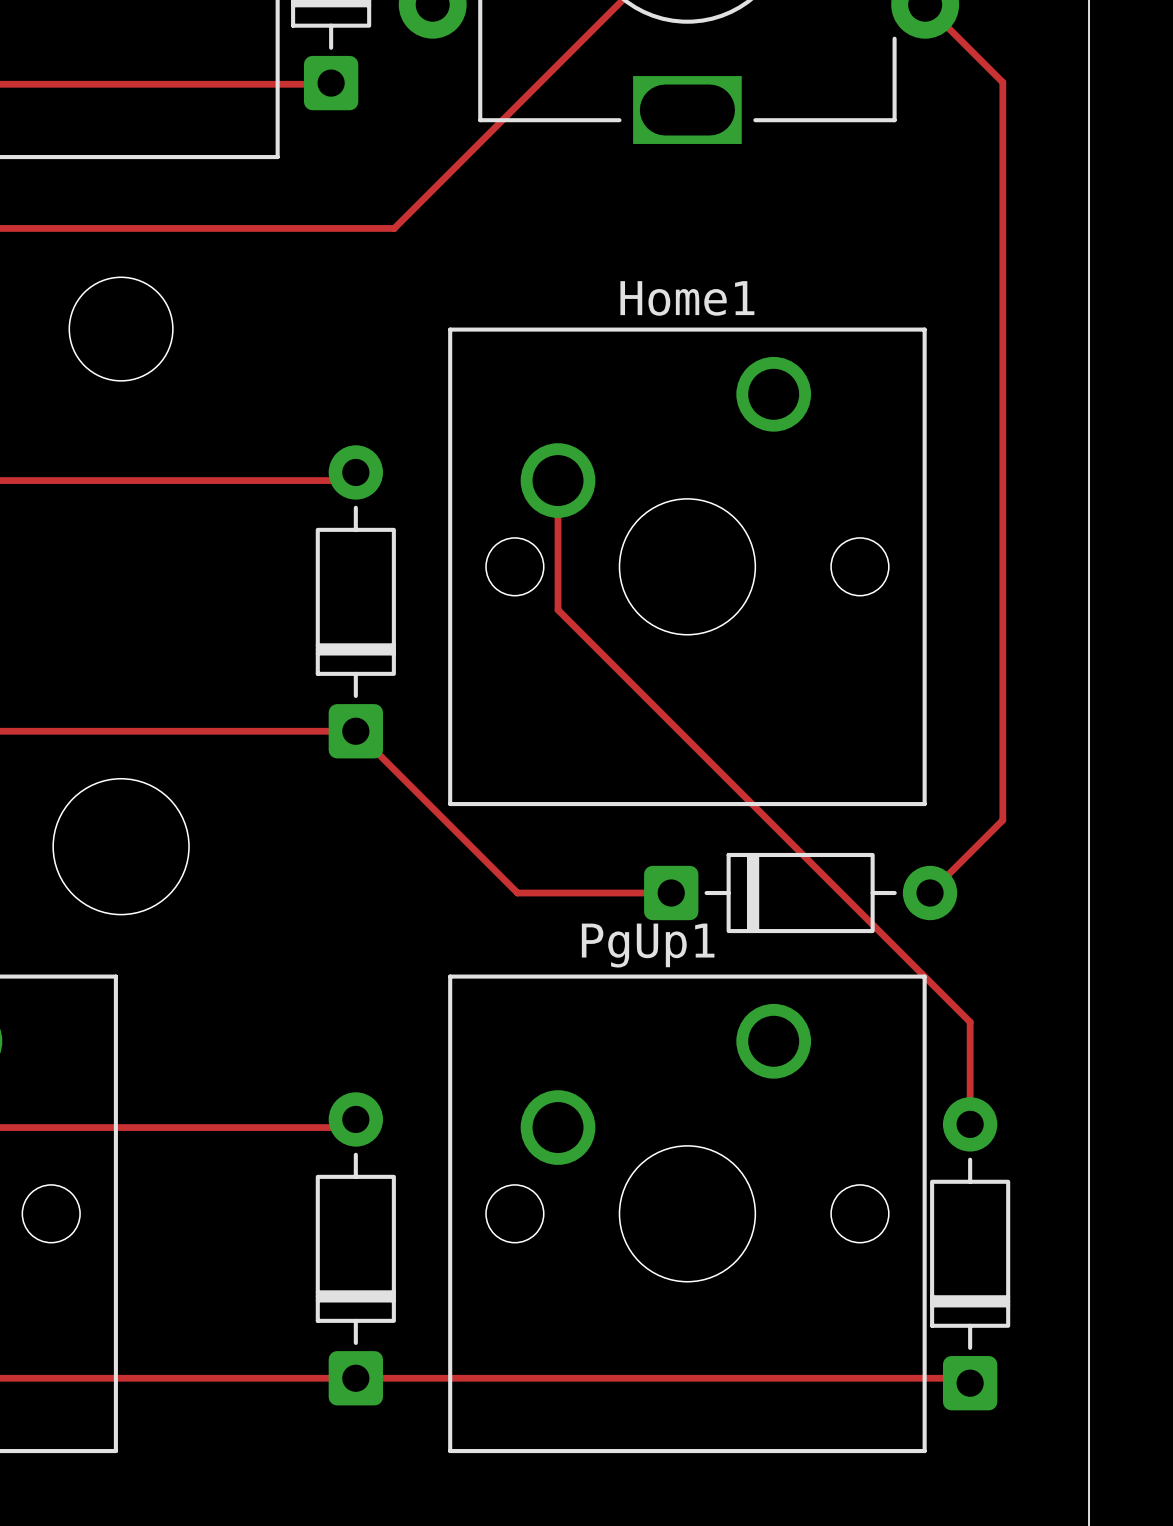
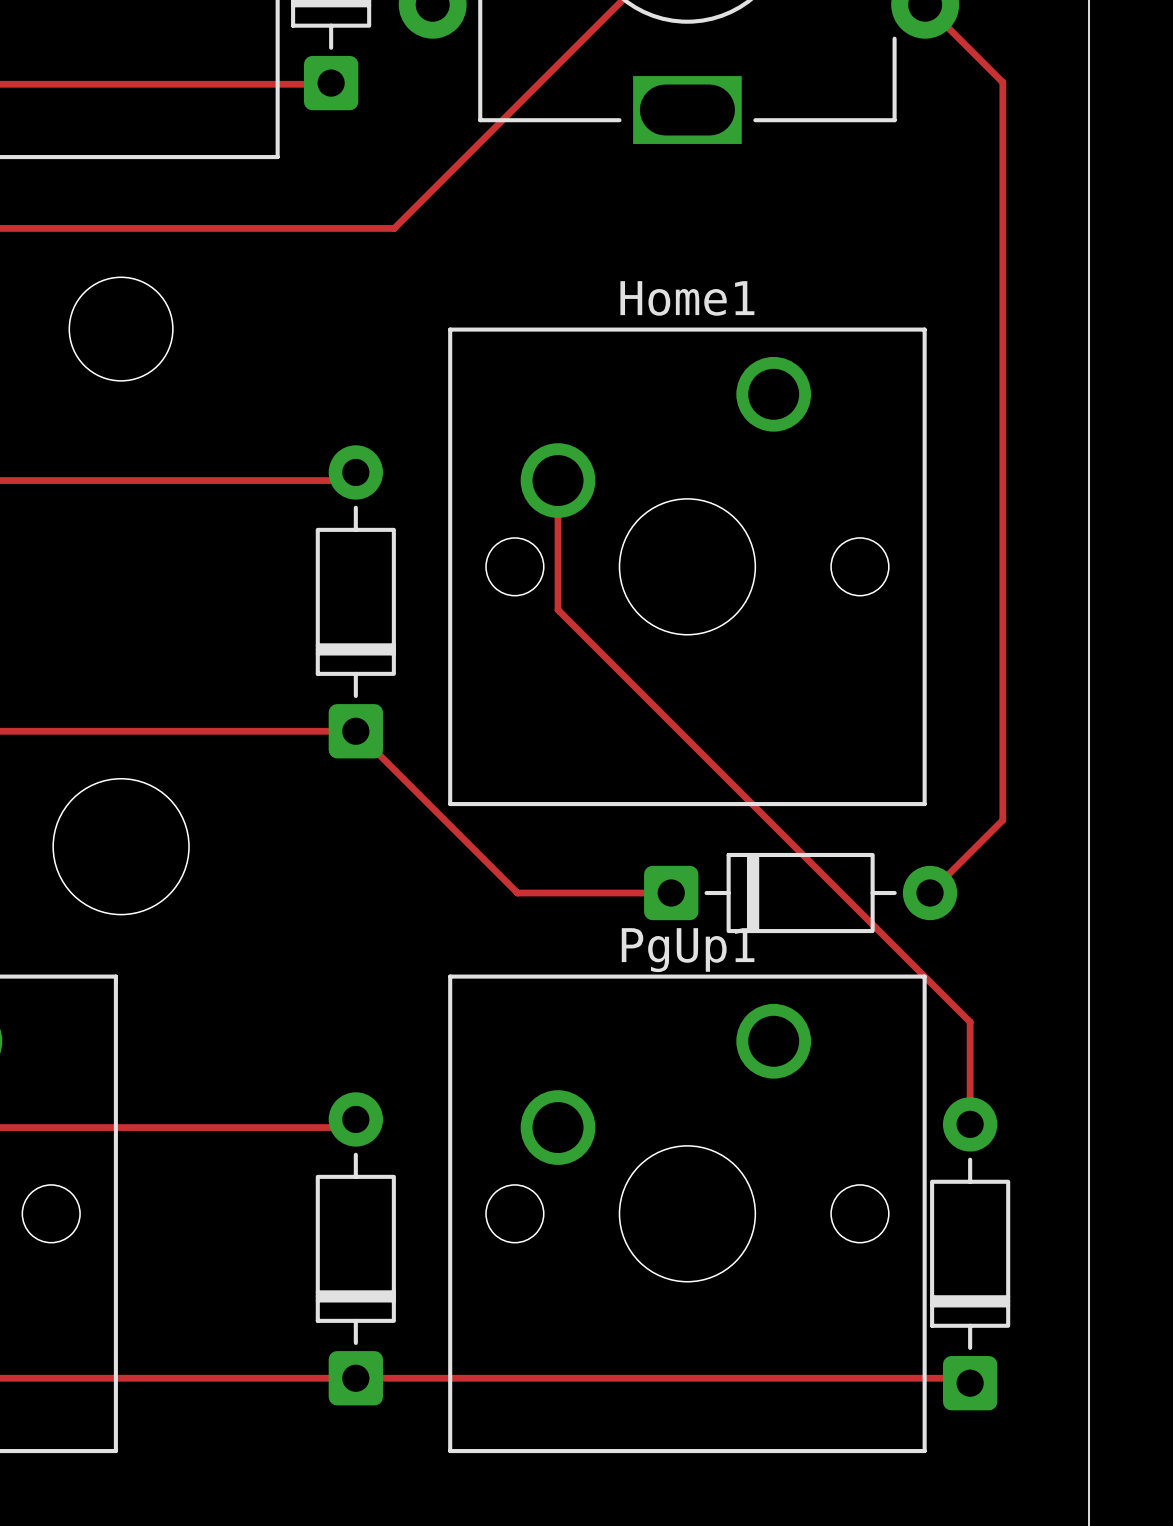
PgUp1 name position: PgUp1 (648, 945) -> PgUp1 (688, 950)

